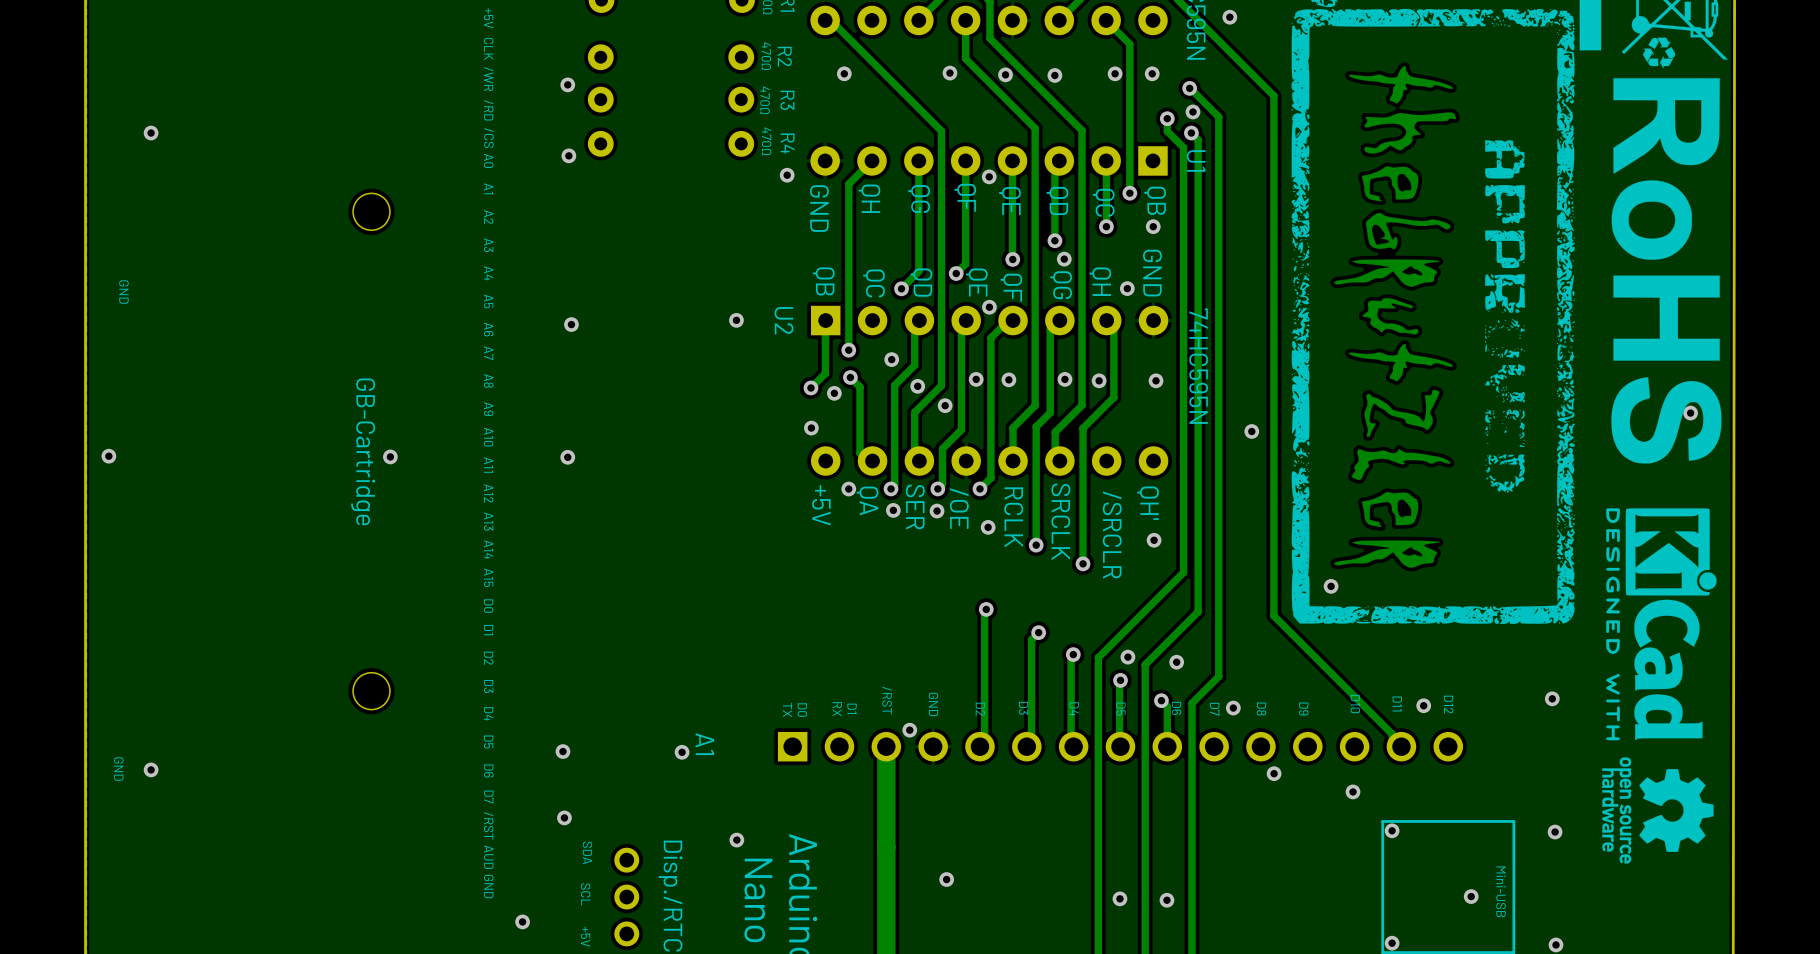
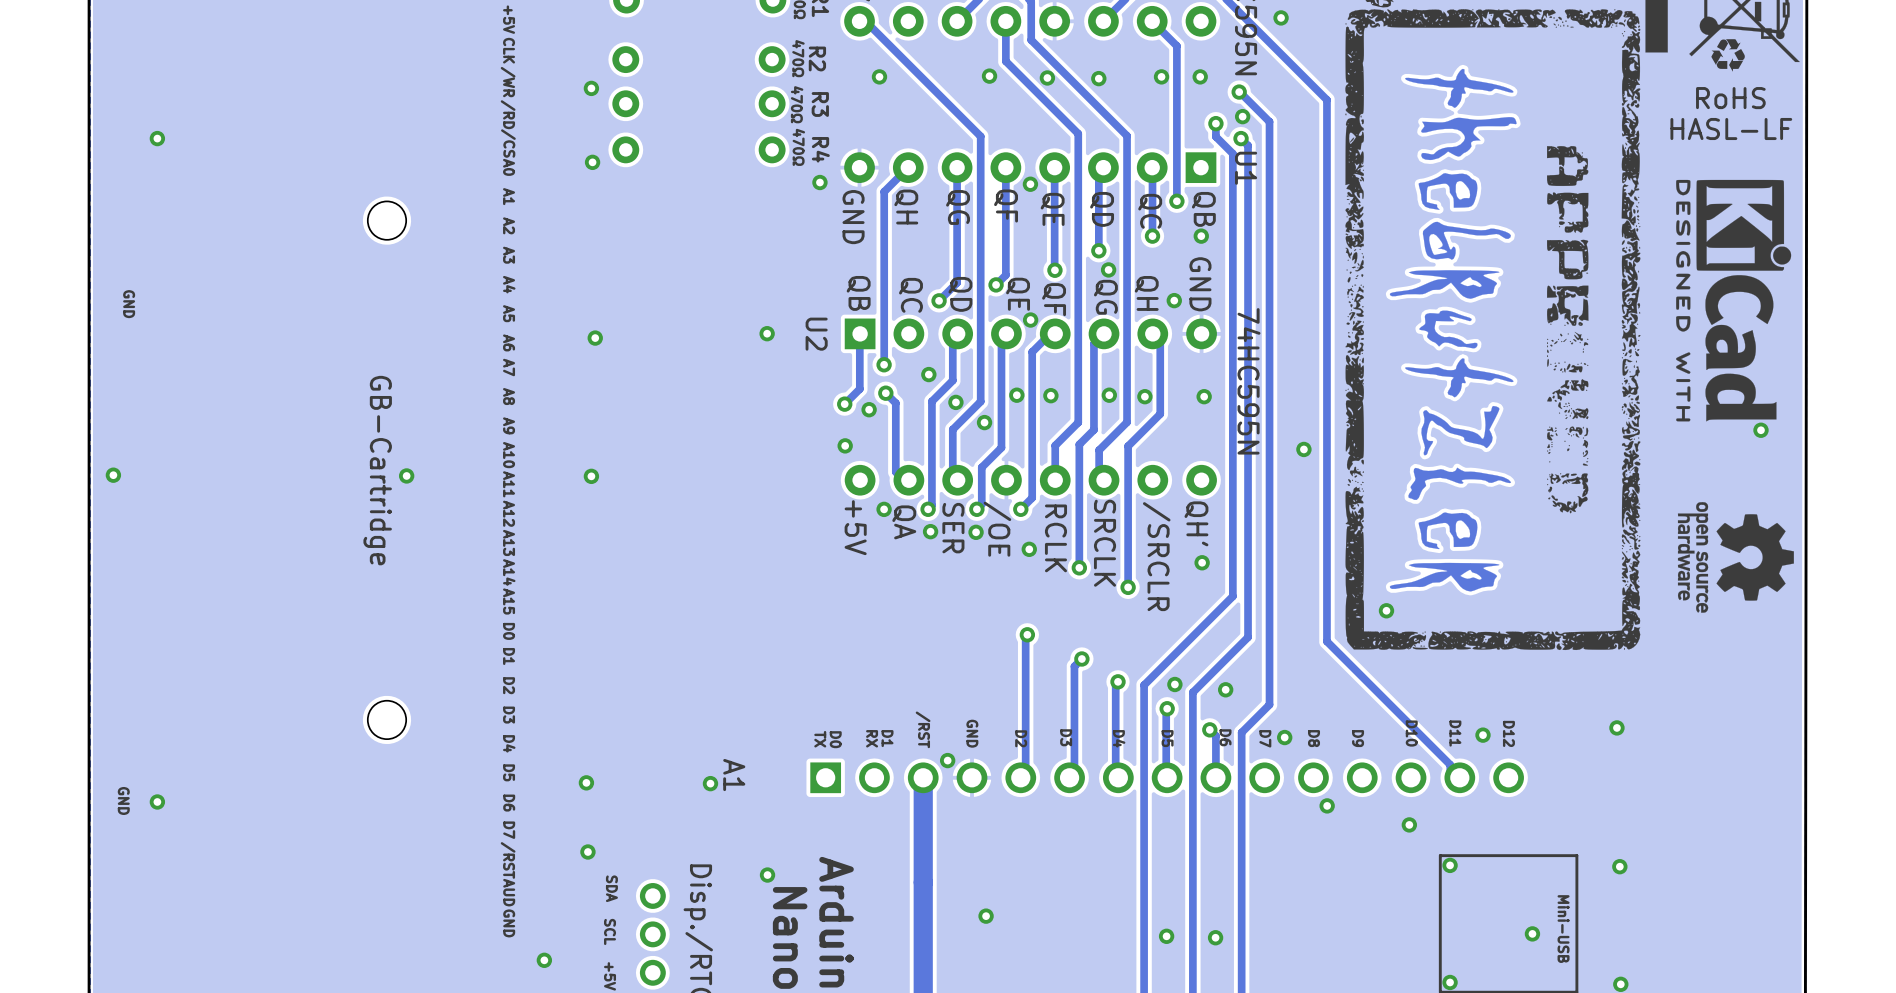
drawing: [1611, 78, 1722, 464] -> none
text: none -> RoHS (1730, 98)
text: none -> HASL-LF (1731, 129)
drawing position: (1661, 624) -> (1733, 300)
drawing position: (1657, 810) -> (1735, 557)

